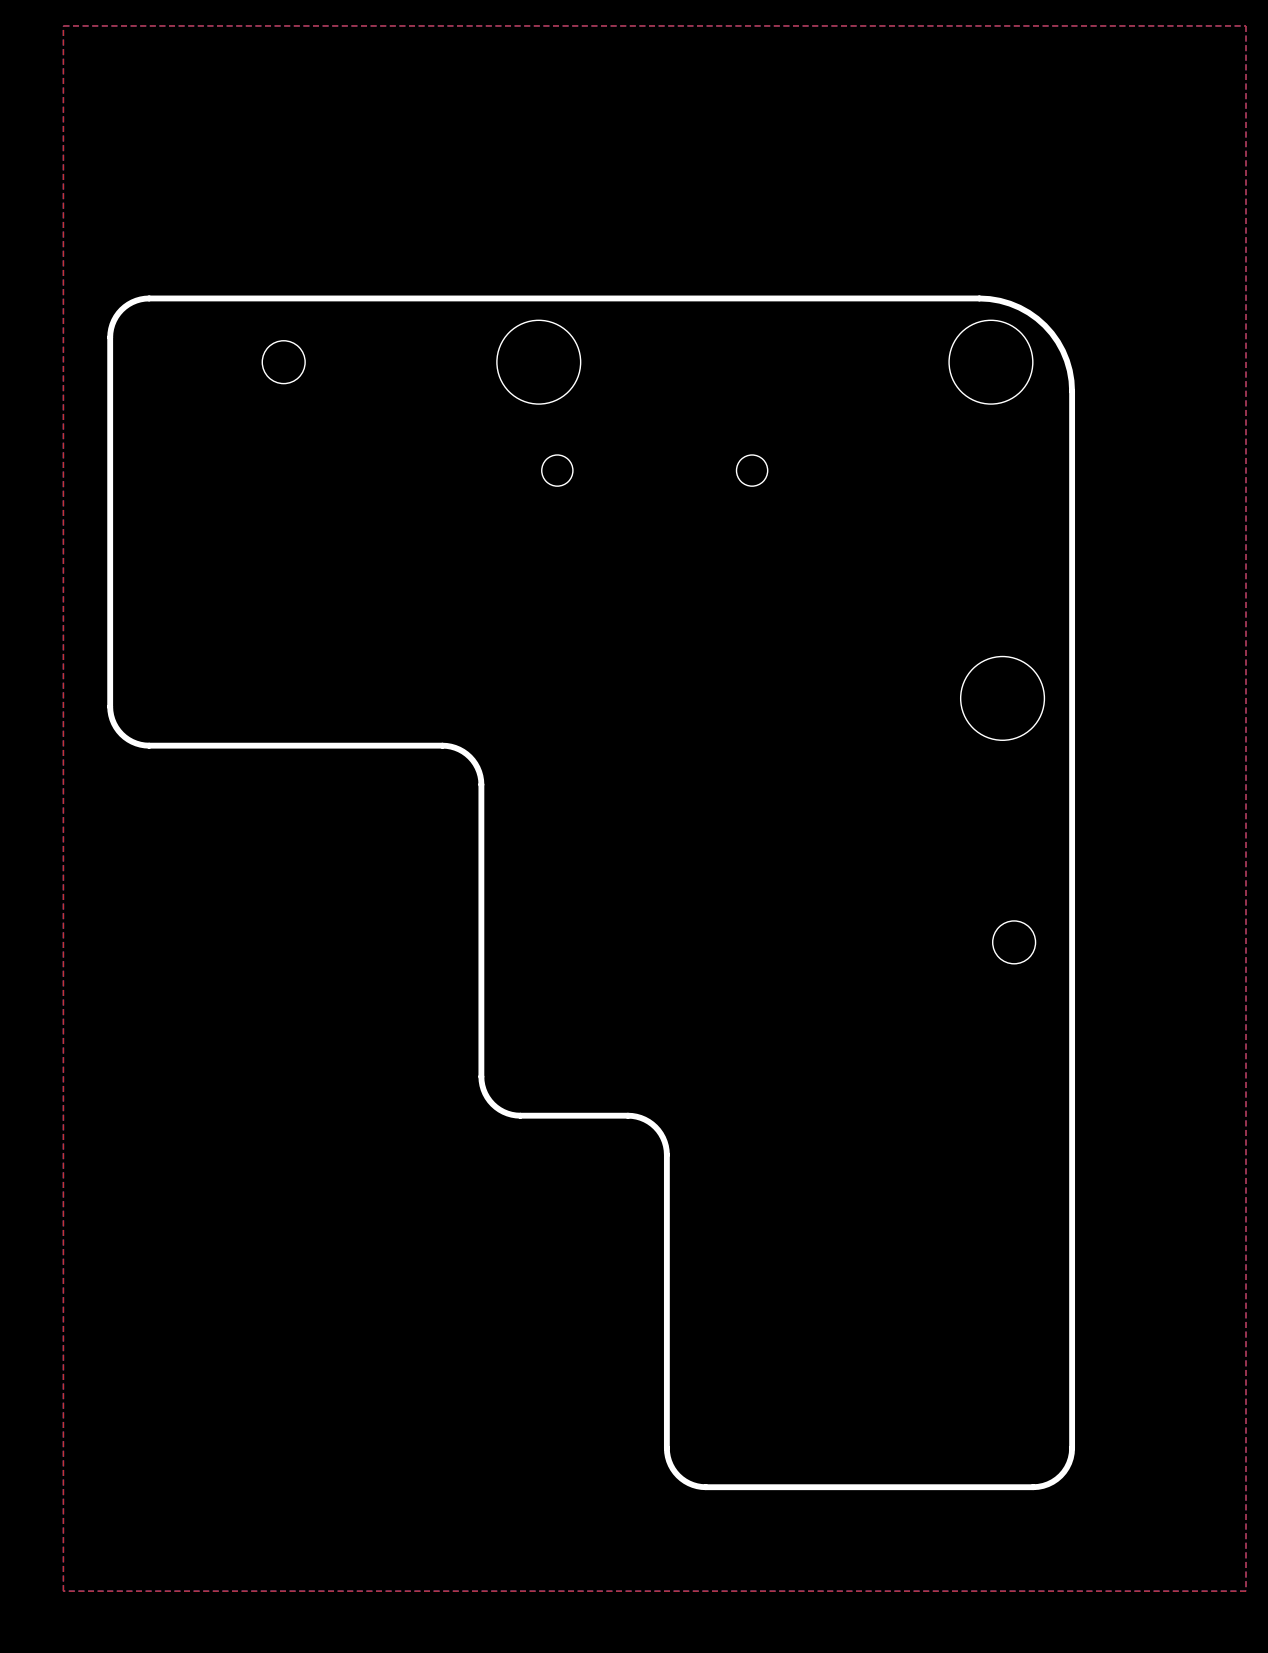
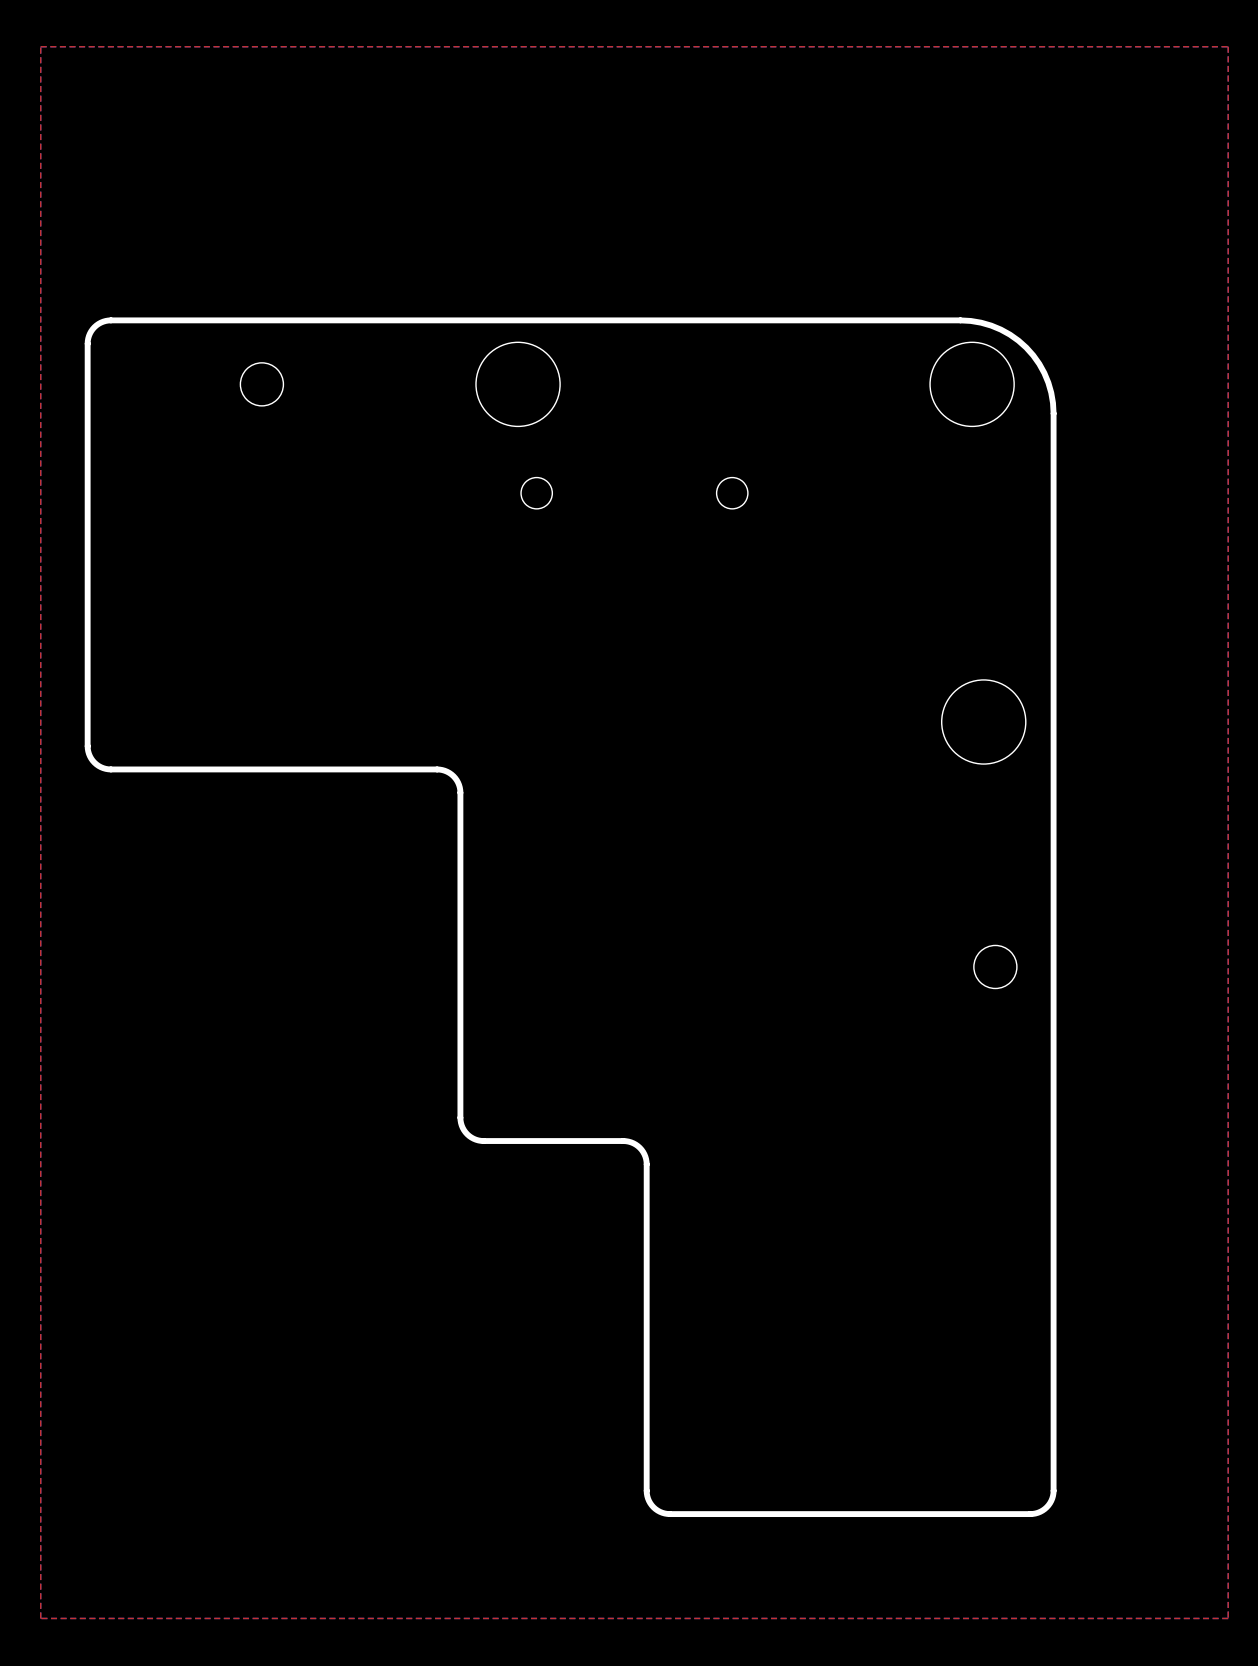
drawing shape: [107, 295, 1076, 1491] -> [84, 317, 1057, 1518]

